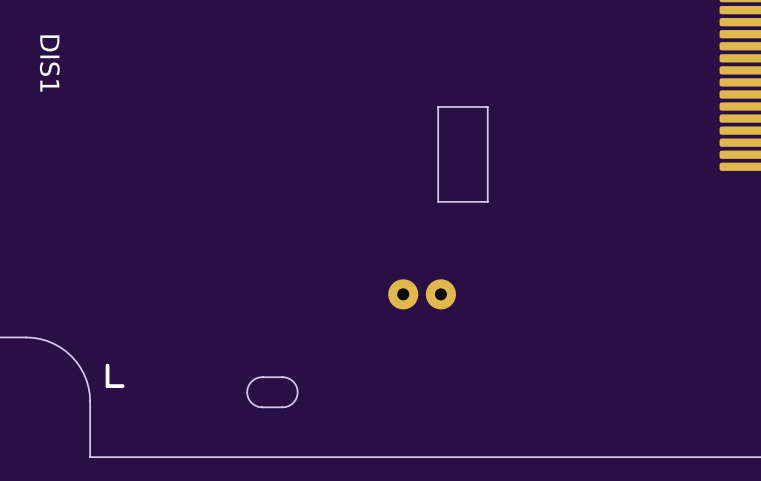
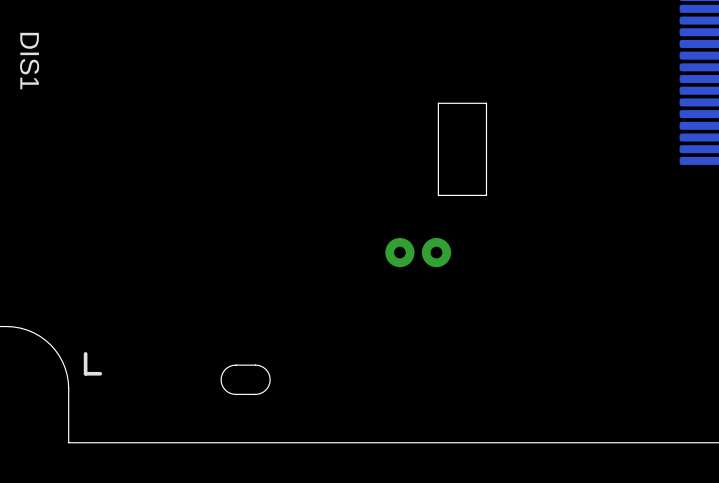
board edge: (487, 106) (438, 106) (438, 201) (487, 201) (487, 106) -> (486, 103) (438, 103) (438, 195) (486, 195) (486, 103)
part position: (422, 294) -> (418, 252)

